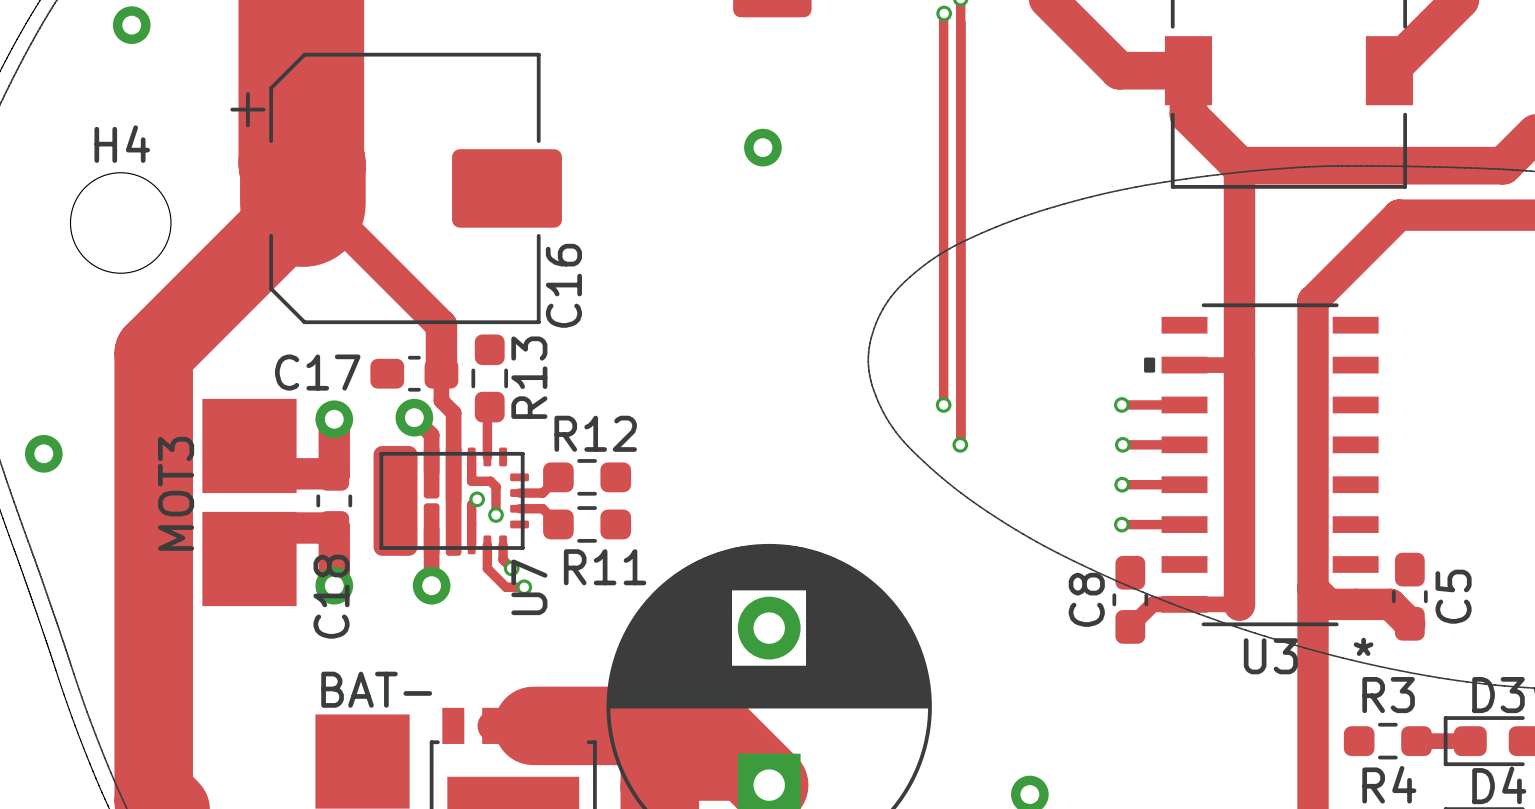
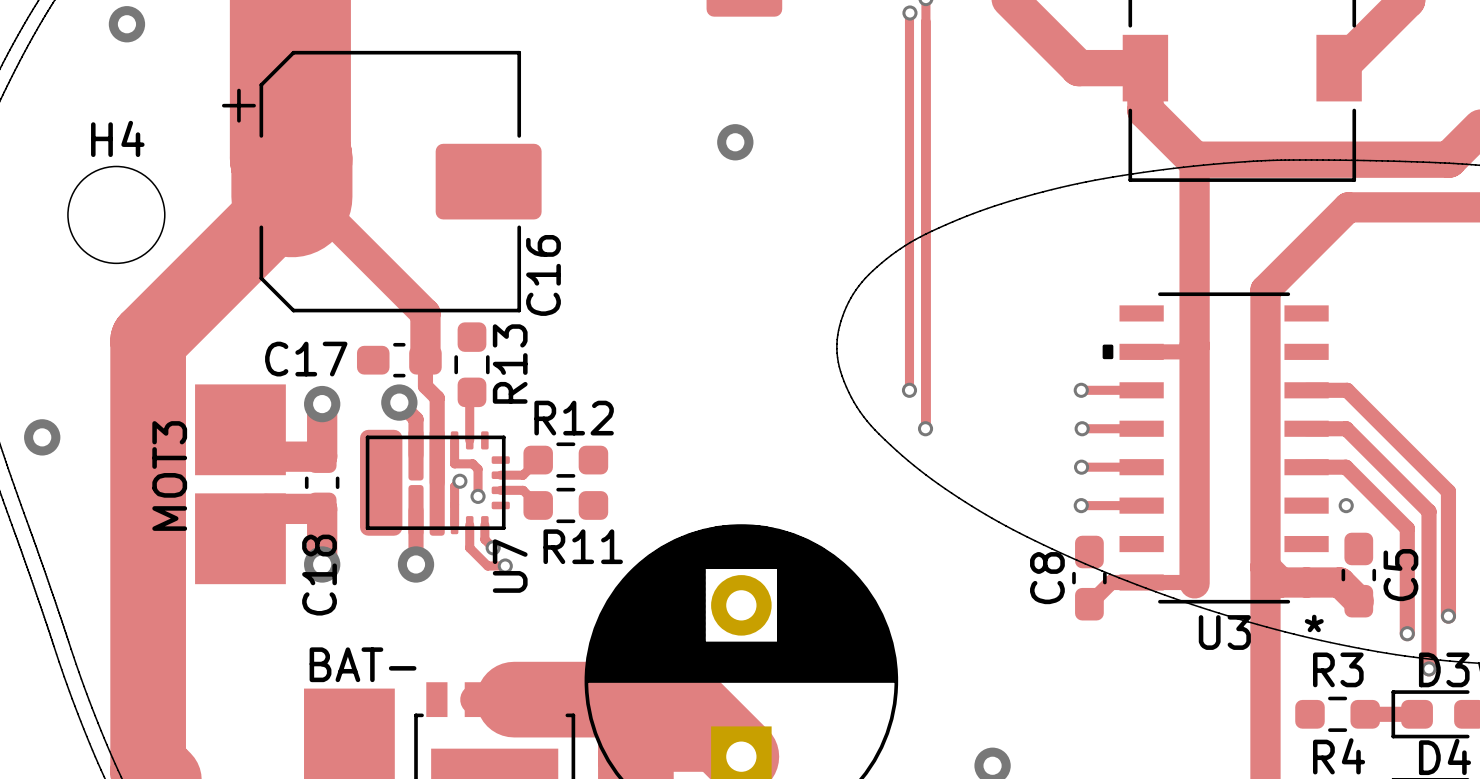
track: none -> (1306, 390) (1347, 390) (1448, 491) (1448, 616)
track: none -> (1306, 428) (1346, 428) (1429, 511) (1429, 668)
track: none -> (1306, 467) (1345, 467) (1407, 528) (1407, 633)
via: none -> (1346, 505)
via: none -> (1448, 616)
via: none -> (1407, 633)
via: none -> (1429, 668)

